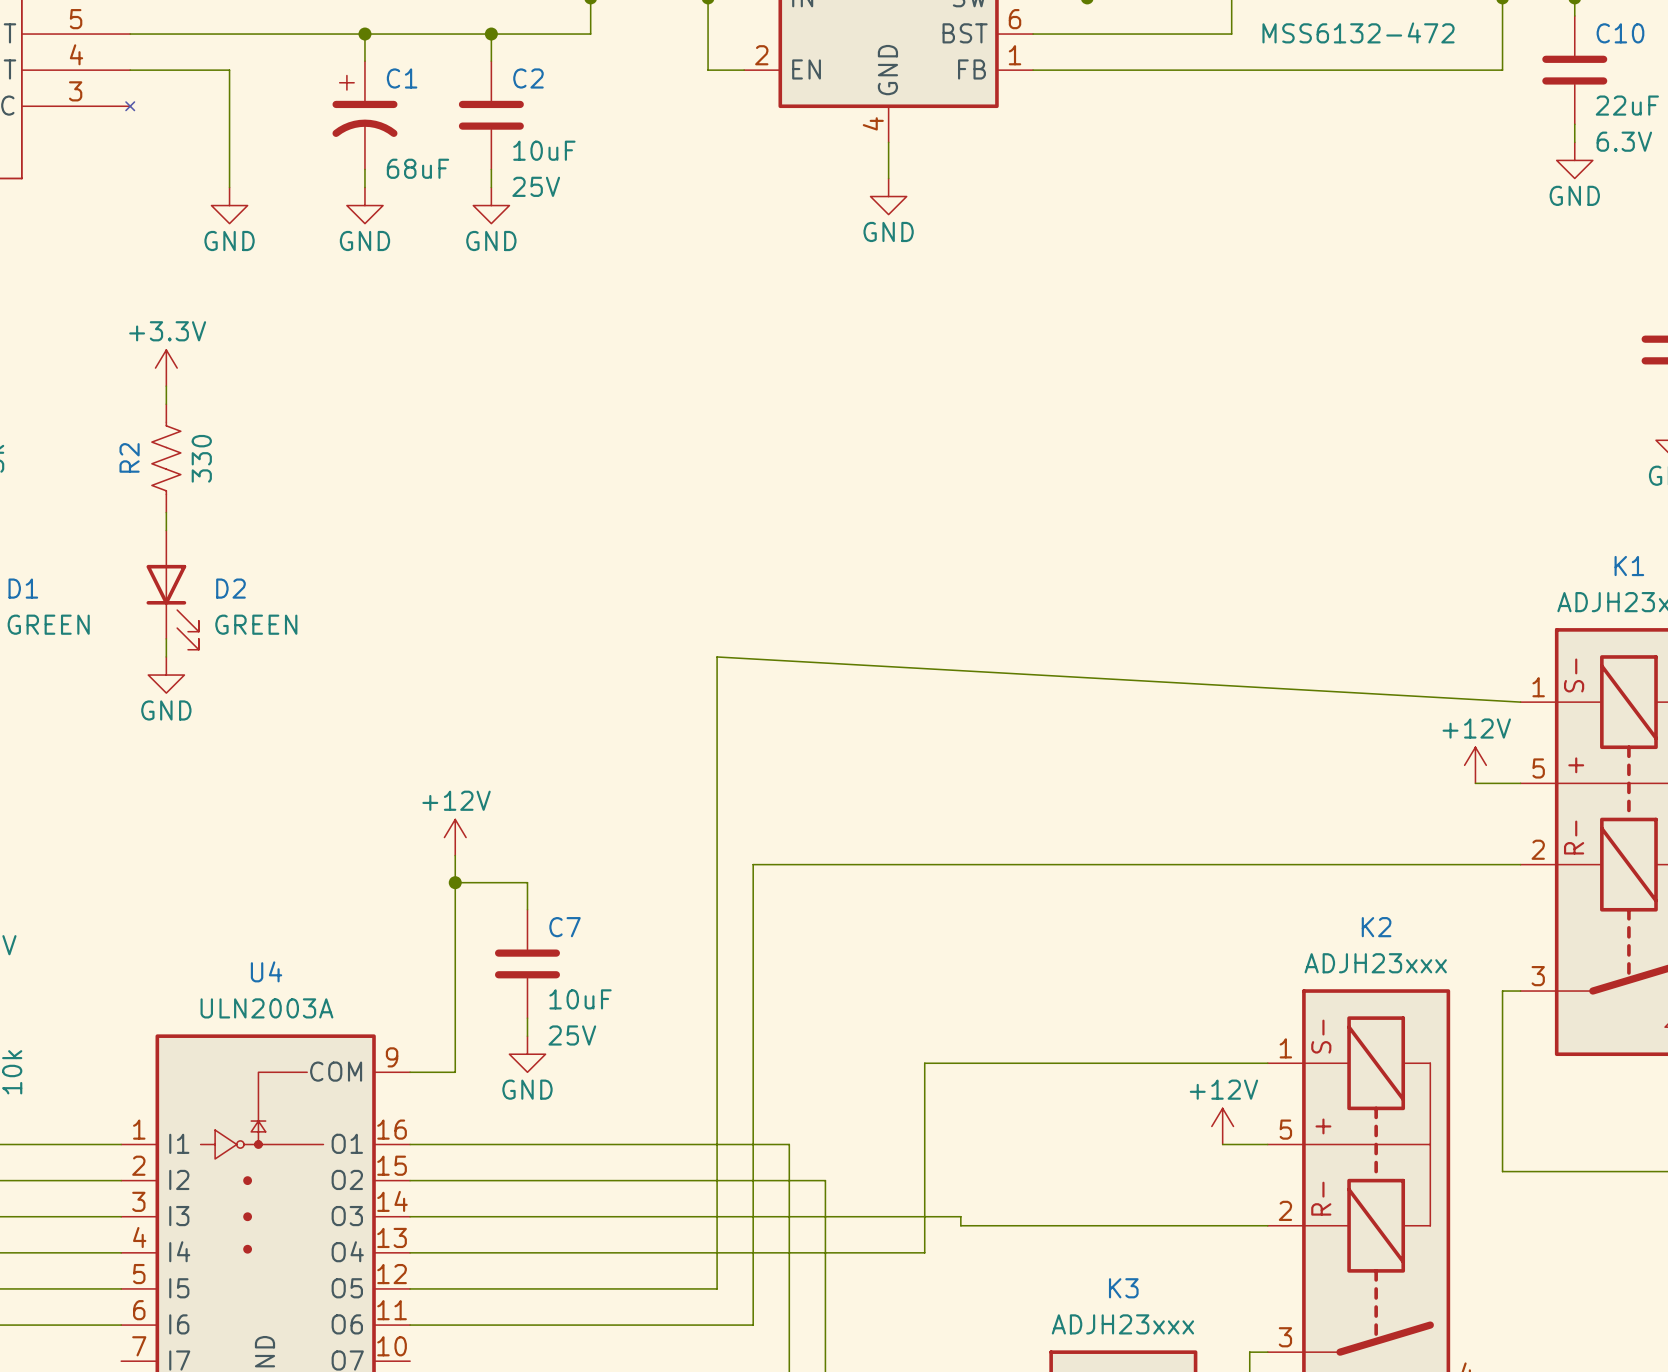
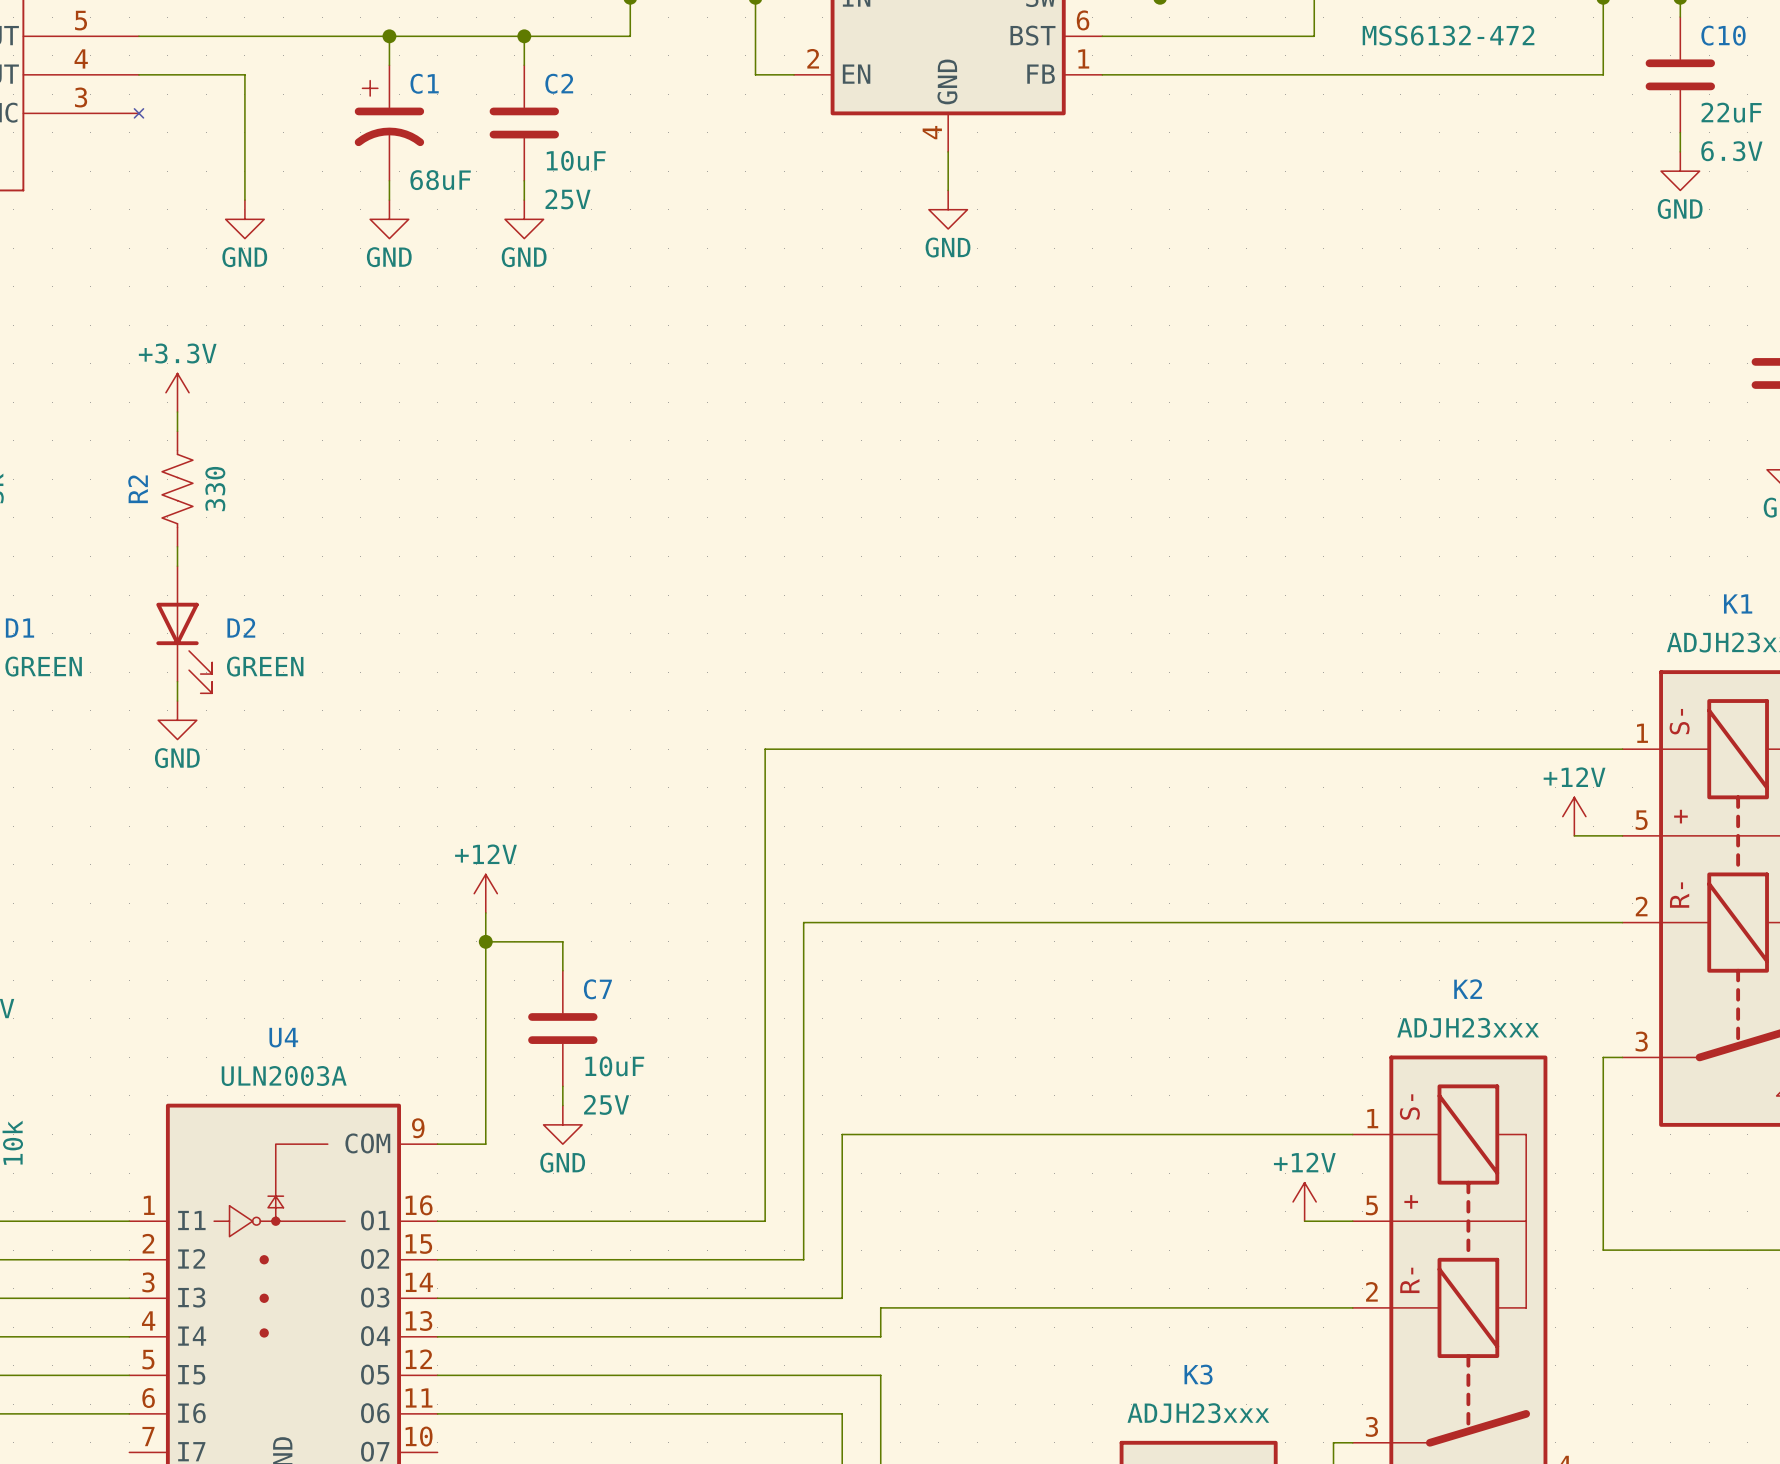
wire: (717, 702) (717, 656) (1520, 702) -> (765, 749) (1622, 749)
wire: (924, 1063) (924, 1252) (825, 1252) (825, 1288) -> (986, 1134) (842, 1134) (842, 1221)
wire: (789, 1144) (717, 1144) (717, 1288) -> (880, 1375) (765, 1375)
wire: (825, 1225) (825, 1180) (753, 1180) (753, 1325) -> (842, 1413) (803, 1413)
wire: (960, 1225) (960, 1216) (789, 1216) (789, 1325) -> (1025, 1307) (880, 1307)

